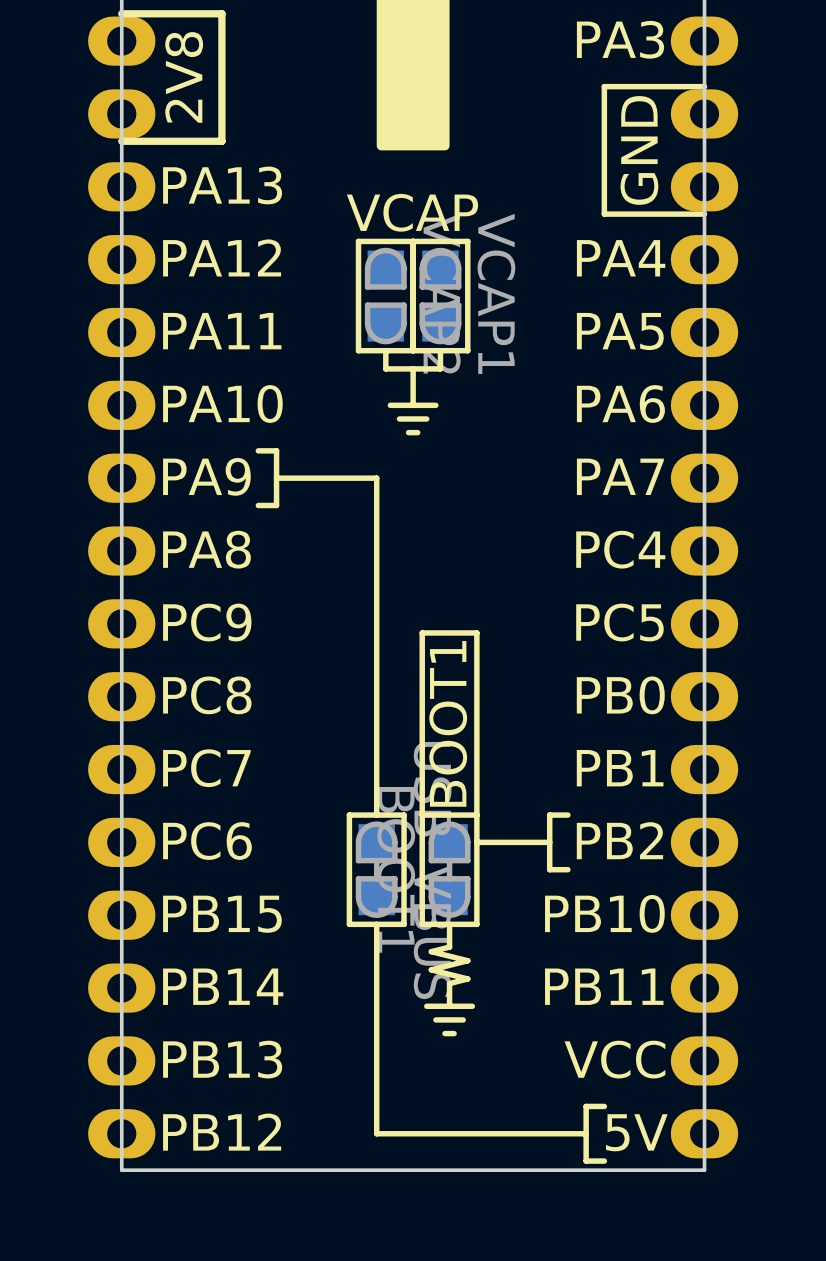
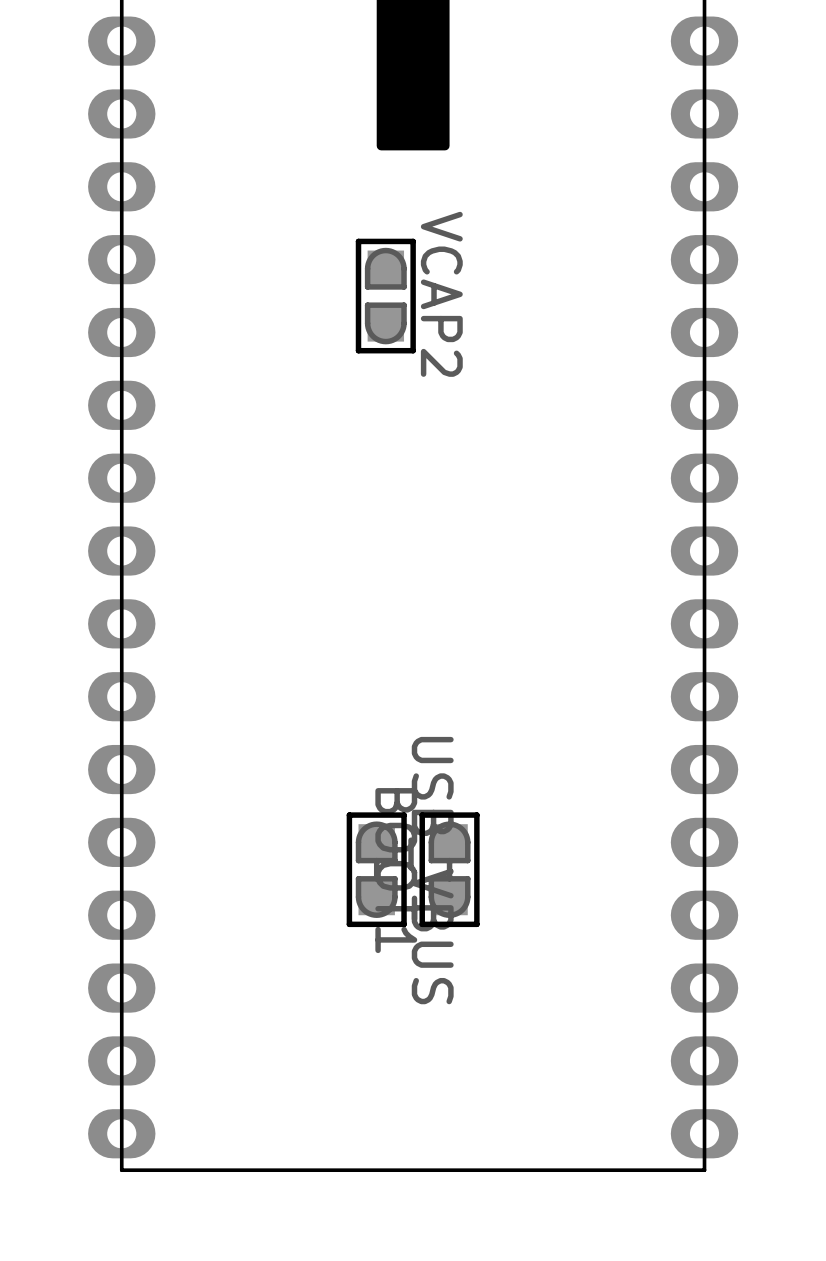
line: (121, 13) (221, 13) (221, 141) (121, 141) -> none
text: PA3 (620, 39) -> none
text: 2V8 (184, 77) -> none
line: (704, 86) (604, 86) (604, 214) (704, 214) -> none
text: GND (639, 150) -> none
text: PA13 (222, 185) -> none
text: VCAP (412, 212) -> none
text: PA12 (222, 257) -> none
text: PA4 (621, 258) -> none
part: VCAP1 (440, 296) -> none
text: PA11 (222, 331) -> none
text: PA5 (620, 331) -> none
line: (440, 350) (440, 368) (385, 368) (385, 350) -> none
line: (413, 368) (413, 405) -> none
text: PA10 (222, 403) -> none
text: PA6 (620, 403) -> none
line: (435, 405) (390, 405) -> none
line: (426, 418) (399, 418) -> none
line: (417, 432) (408, 432) -> none
line: (258, 450) (276, 450) (276, 505) (258, 505) -> none
text: PA9 (206, 476) -> none
text: PA7 (620, 476) -> none
line: (276, 478) (376, 478) (376, 815) -> none
text: PA8 (206, 549) -> none
text: PC4 (620, 549) -> none
text: PC9 (207, 622) -> none
text: PC5 (619, 622) -> none
text: PC8 (207, 695) -> none
text: PB0 (620, 695) -> none
text: BOOT1 (448, 723) -> none
text: PC7 (206, 768) -> none
text: PB1 (620, 768) -> none
line: (476, 815) (476, 632) (422, 632) (422, 815) -> none
line: (567, 815) (549, 815) (549, 869) (567, 869) -> none
text: PB2 (619, 840) -> none
text: PC6 (207, 841) -> none
line: (549, 842) (476, 842) -> none
text: PB10 (604, 913) -> none
text: PB15 (222, 914) -> none
line: (376, 924) (376, 1133) (586, 1133) -> none
line: (449, 924) (449, 947) (431, 951) (467, 960) (431, 969) (467, 978) (449, 983) (449, 1006) -> none
text: PB14 (223, 986) -> none
text: PB11 (604, 986) -> none
line: (472, 1006) (426, 1006) -> none
line: (463, 1019) (435, 1019) -> none
line: (454, 1033) (445, 1033) -> none
text: PB13 (222, 1059) -> none
text: VCC (614, 1059) -> none
line: (604, 1106) (586, 1106) (586, 1161) (604, 1161) -> none
text: PB12 (222, 1132) -> none
text: 5V (636, 1132) -> none

